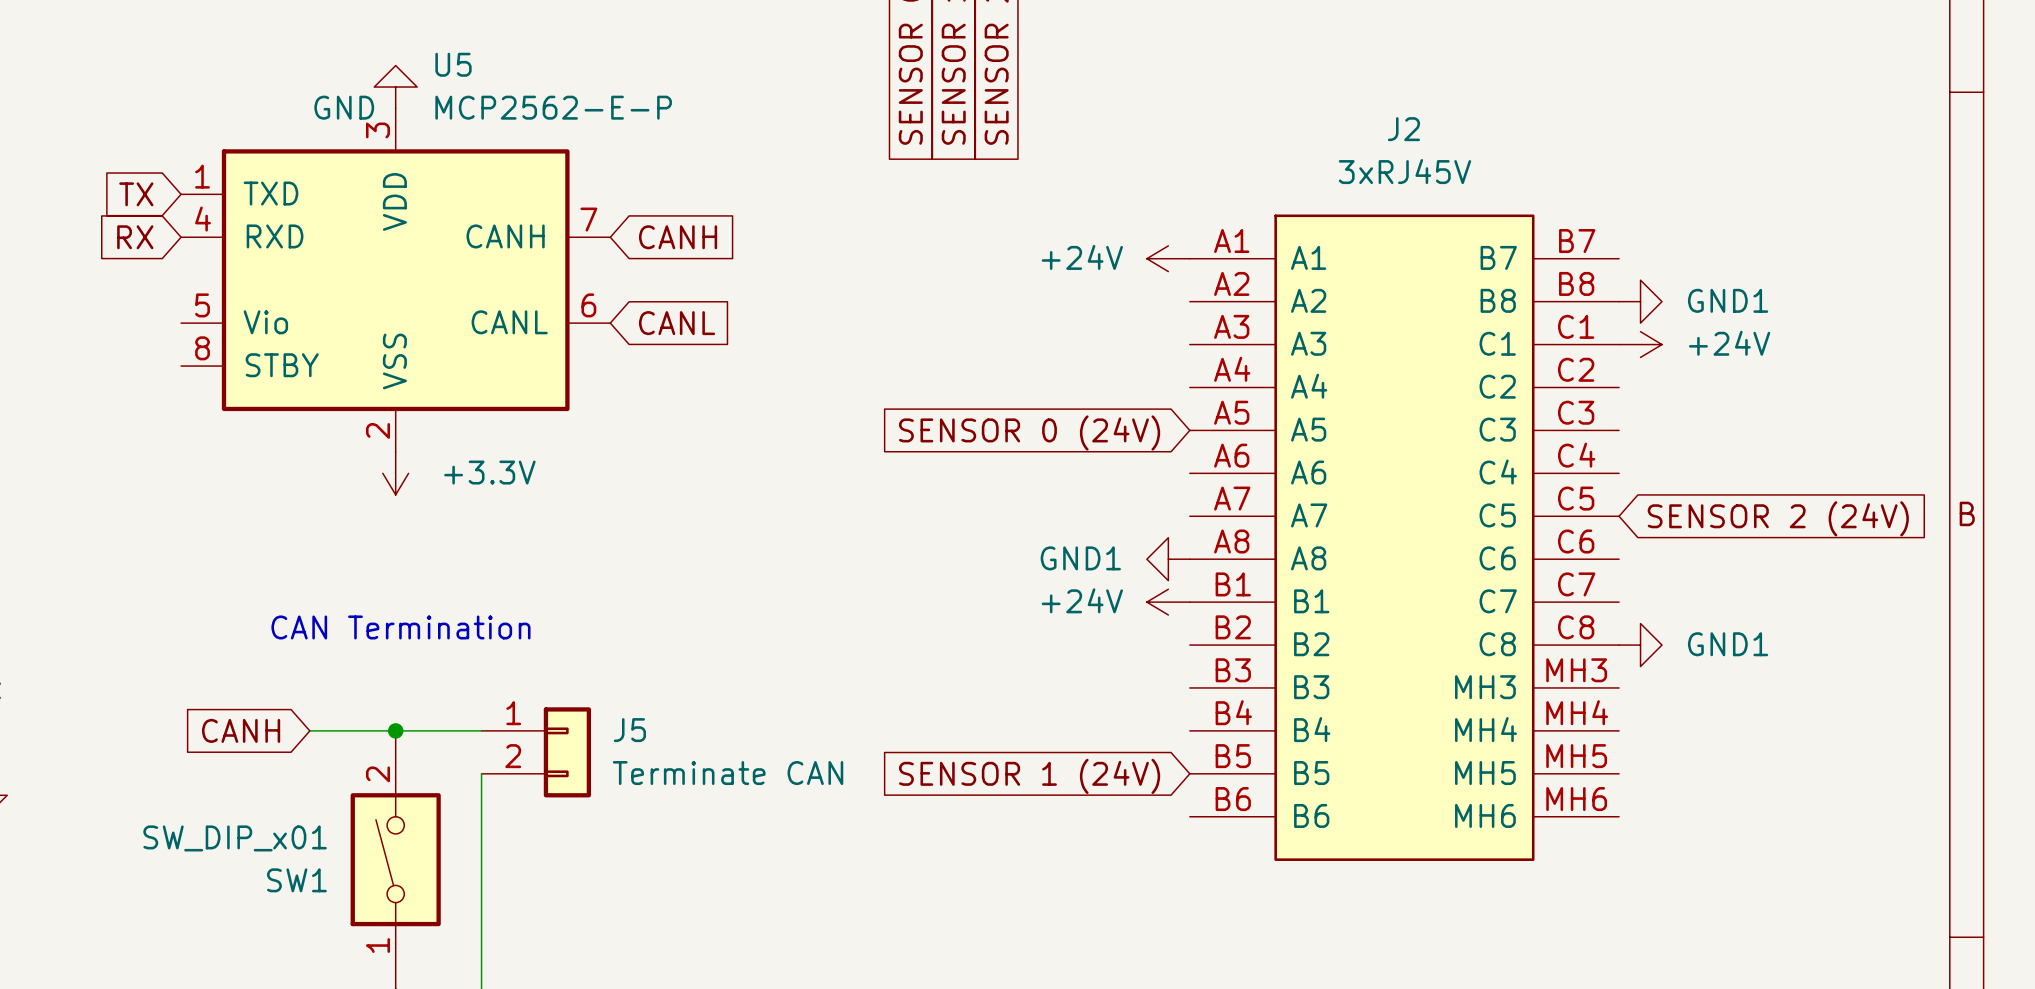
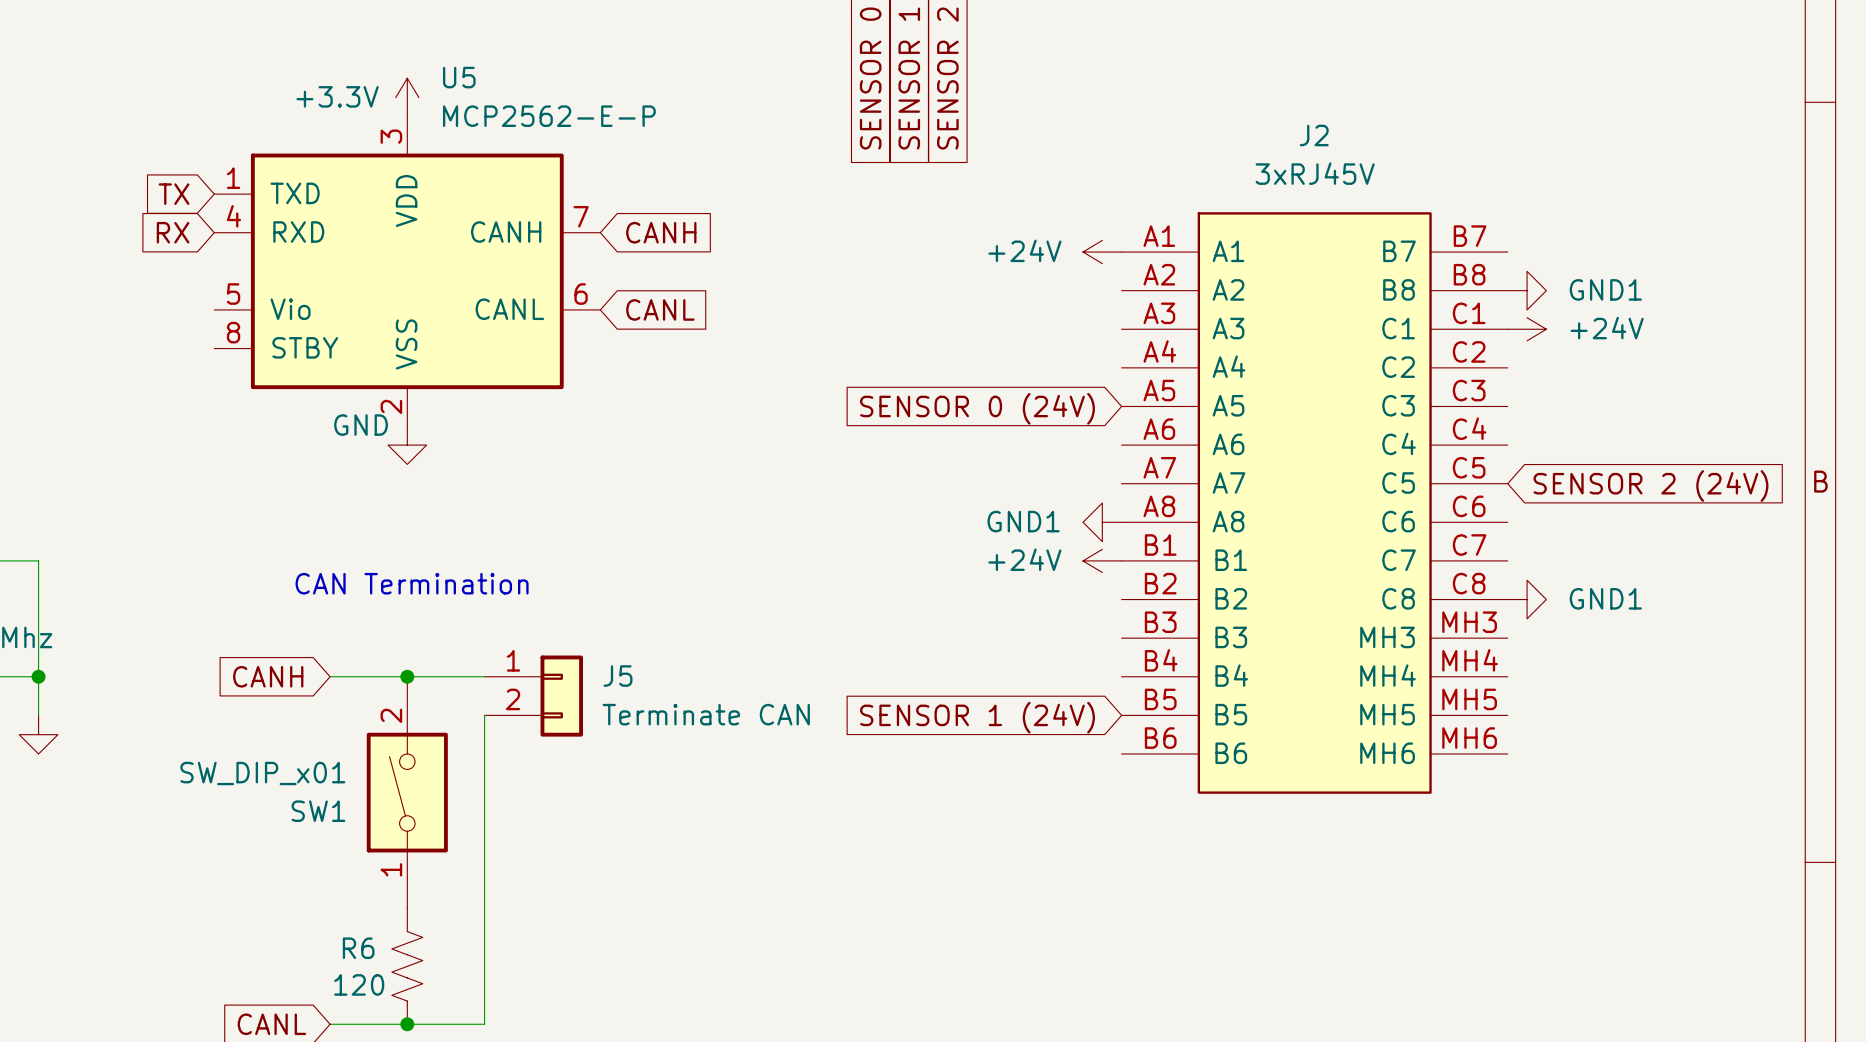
power symbol: GND (395, 87) -> +3.3V (407, 97)
power symbol: +3.3V (395, 473) -> GND (407, 445)

